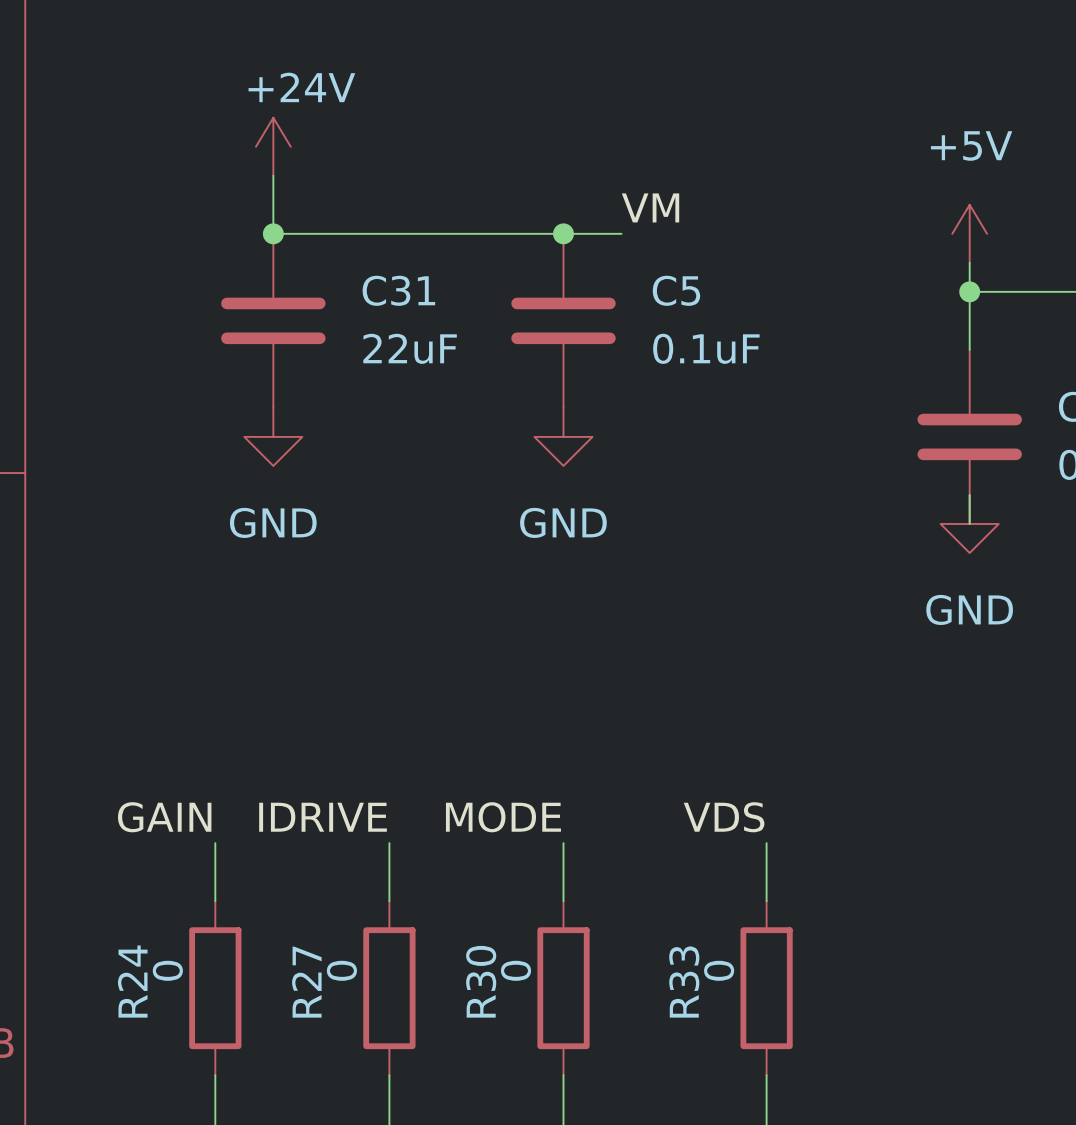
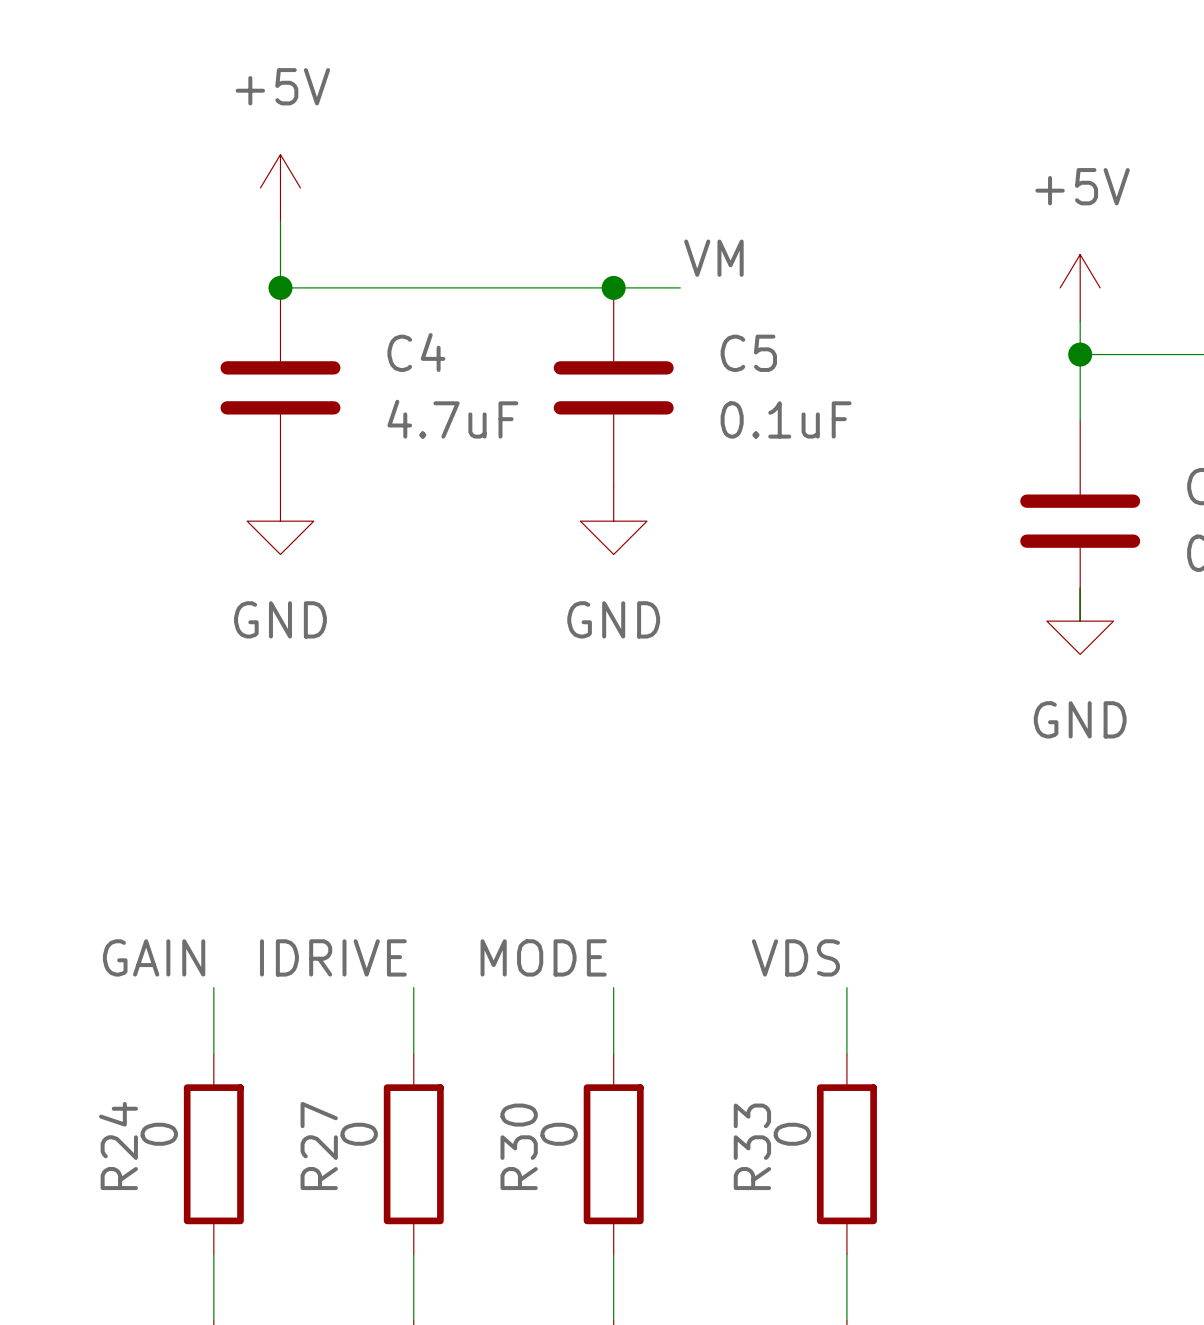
power symbol: +24V (273, 146) -> +5V (280, 187)
C31 name: C31 (398, 290) -> C4 (416, 352)
C31 value: 22uF (410, 348) -> 4.7uF (452, 419)

